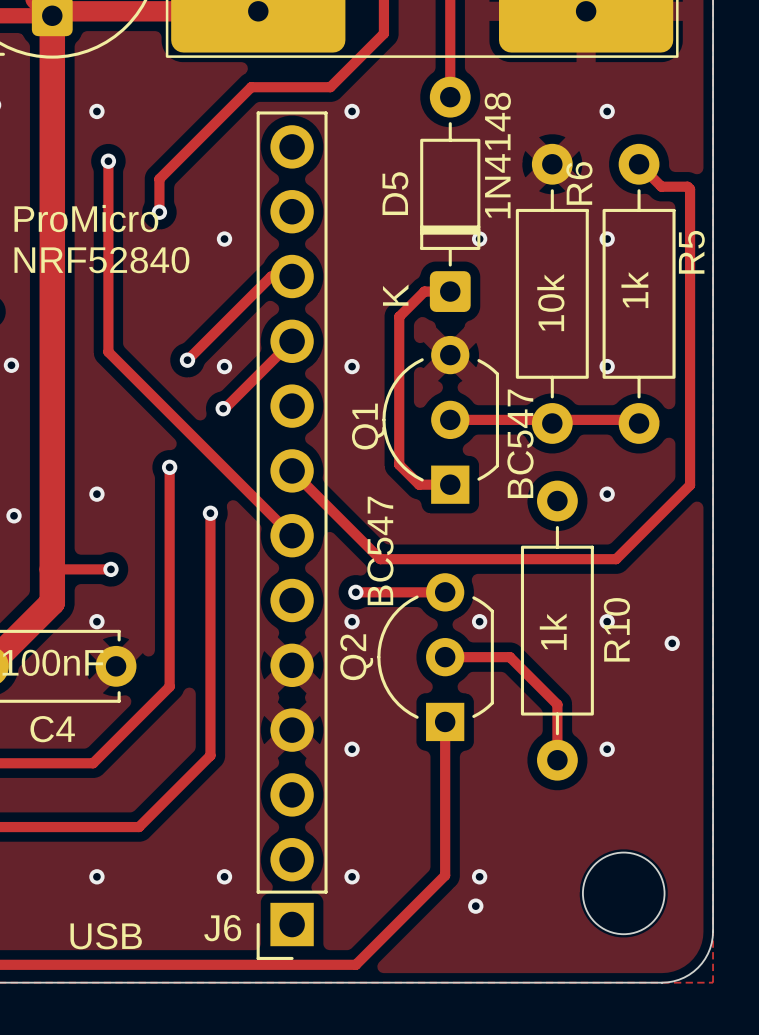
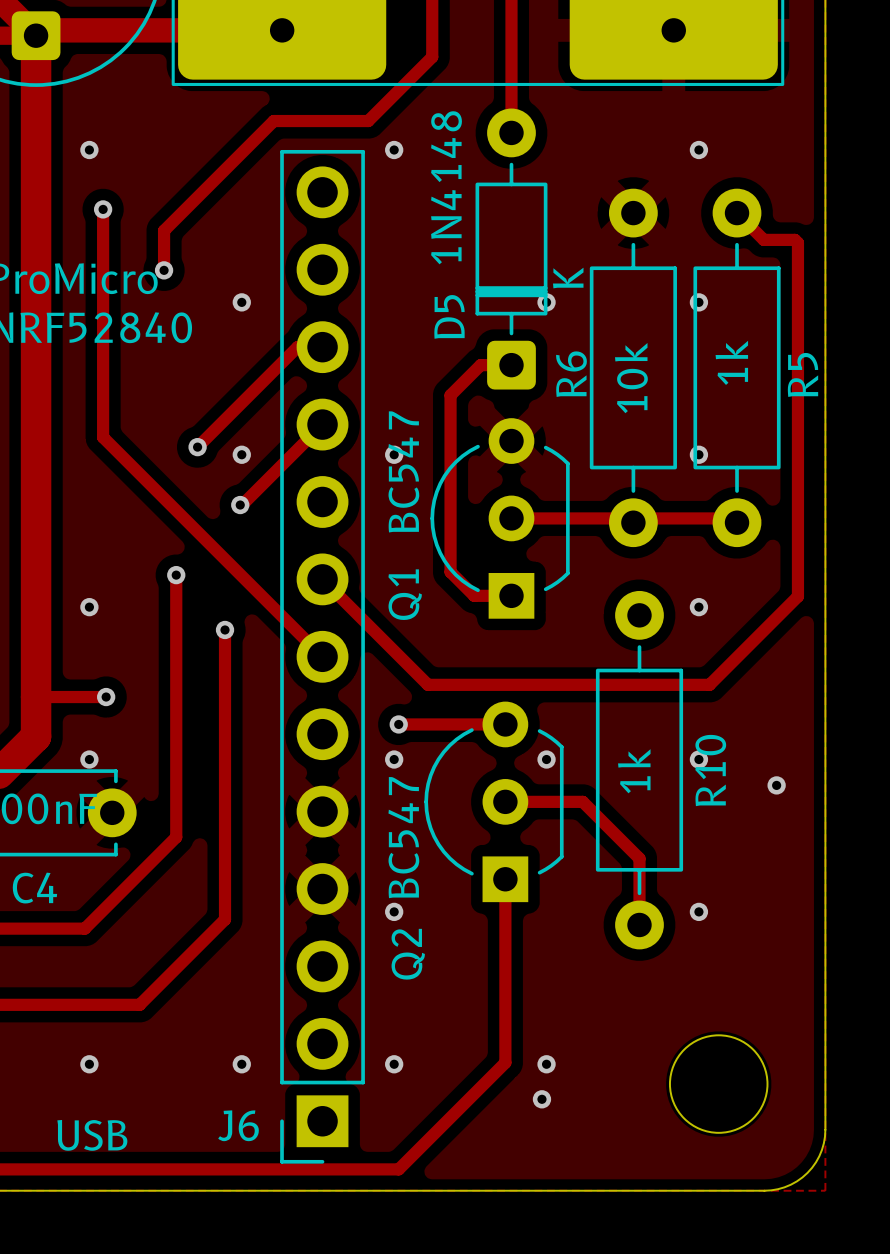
D5 value position: 1N4148 (497, 155) -> 1N4148 (446, 187)
R6 name position: R6 (579, 183) -> R6 (571, 374)
D5 name position: D5 (395, 193) -> D5 (449, 316)
R5 name position: R5 (691, 252) -> R5 (803, 374)
D5 text position: K (395, 295) -> K (568, 278)
Q1 name position: Q1 (368, 426) -> Q1 (405, 594)
Q1 value position: BC547 (520, 443) -> BC547 (403, 471)
Q2 value position: BC547 (380, 550) -> BC547 (403, 837)
Q2 name position: Q2 (356, 657) -> Q2 (408, 954)

